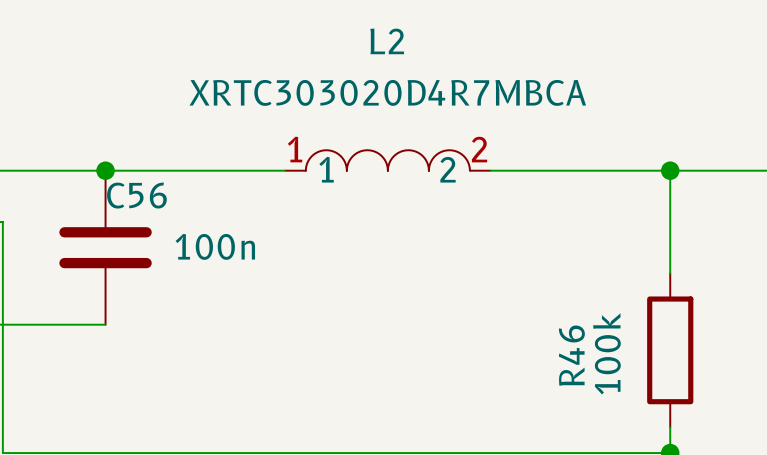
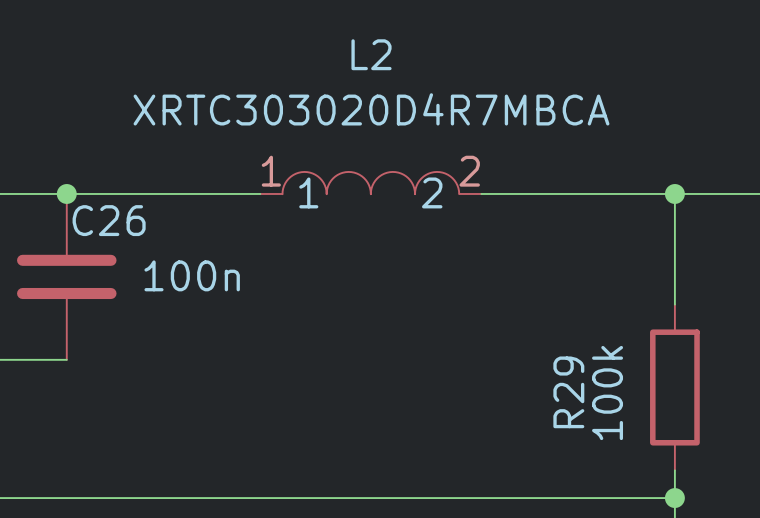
C56 name: C56 (136, 195) -> C26 (109, 220)
R46 name: R46 (571, 355) -> R29 (568, 392)

